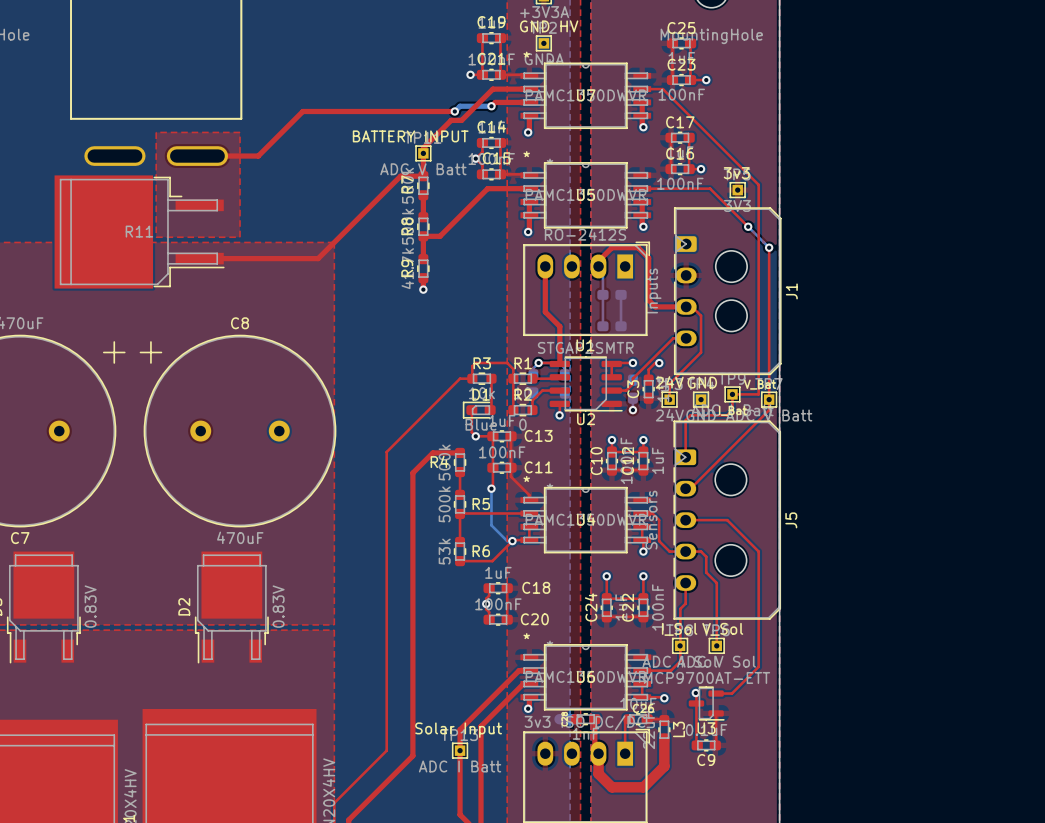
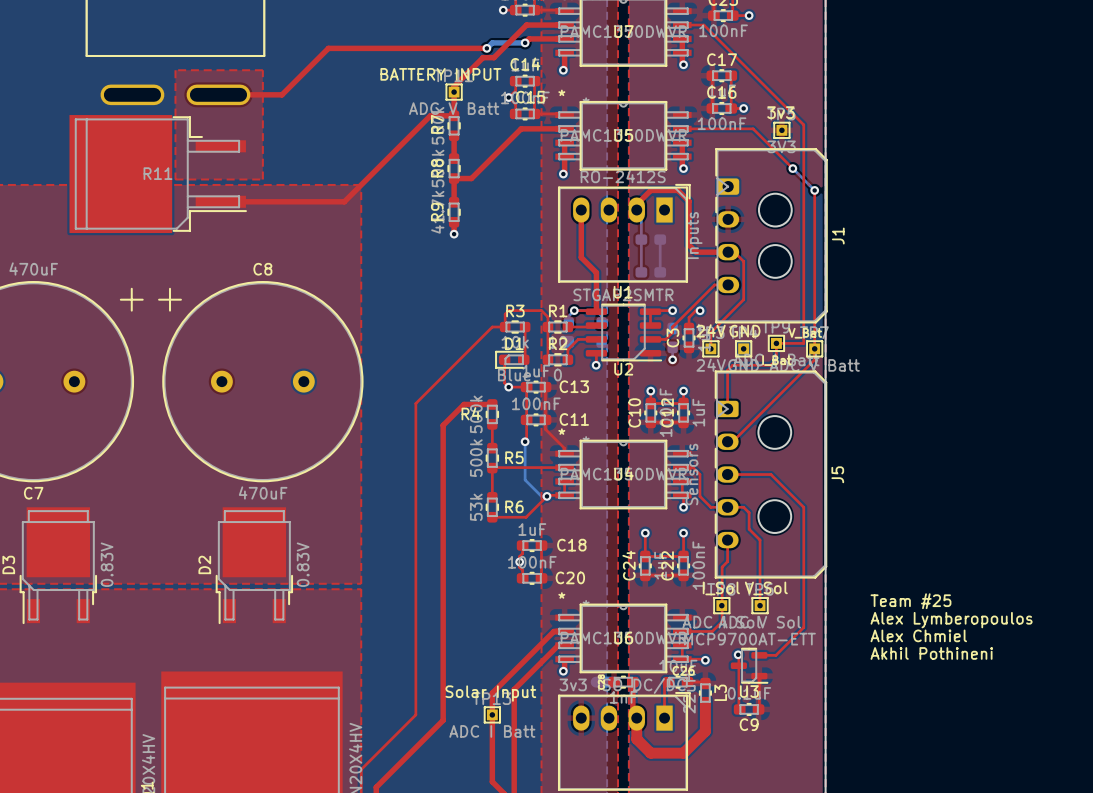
text: none -> Team #25 (910, 601)
text: none -> Alex Lymberopoulos (951, 620)
text: none -> Alex Chmiel (918, 635)
text: none -> Akhil Pothineni (931, 653)

